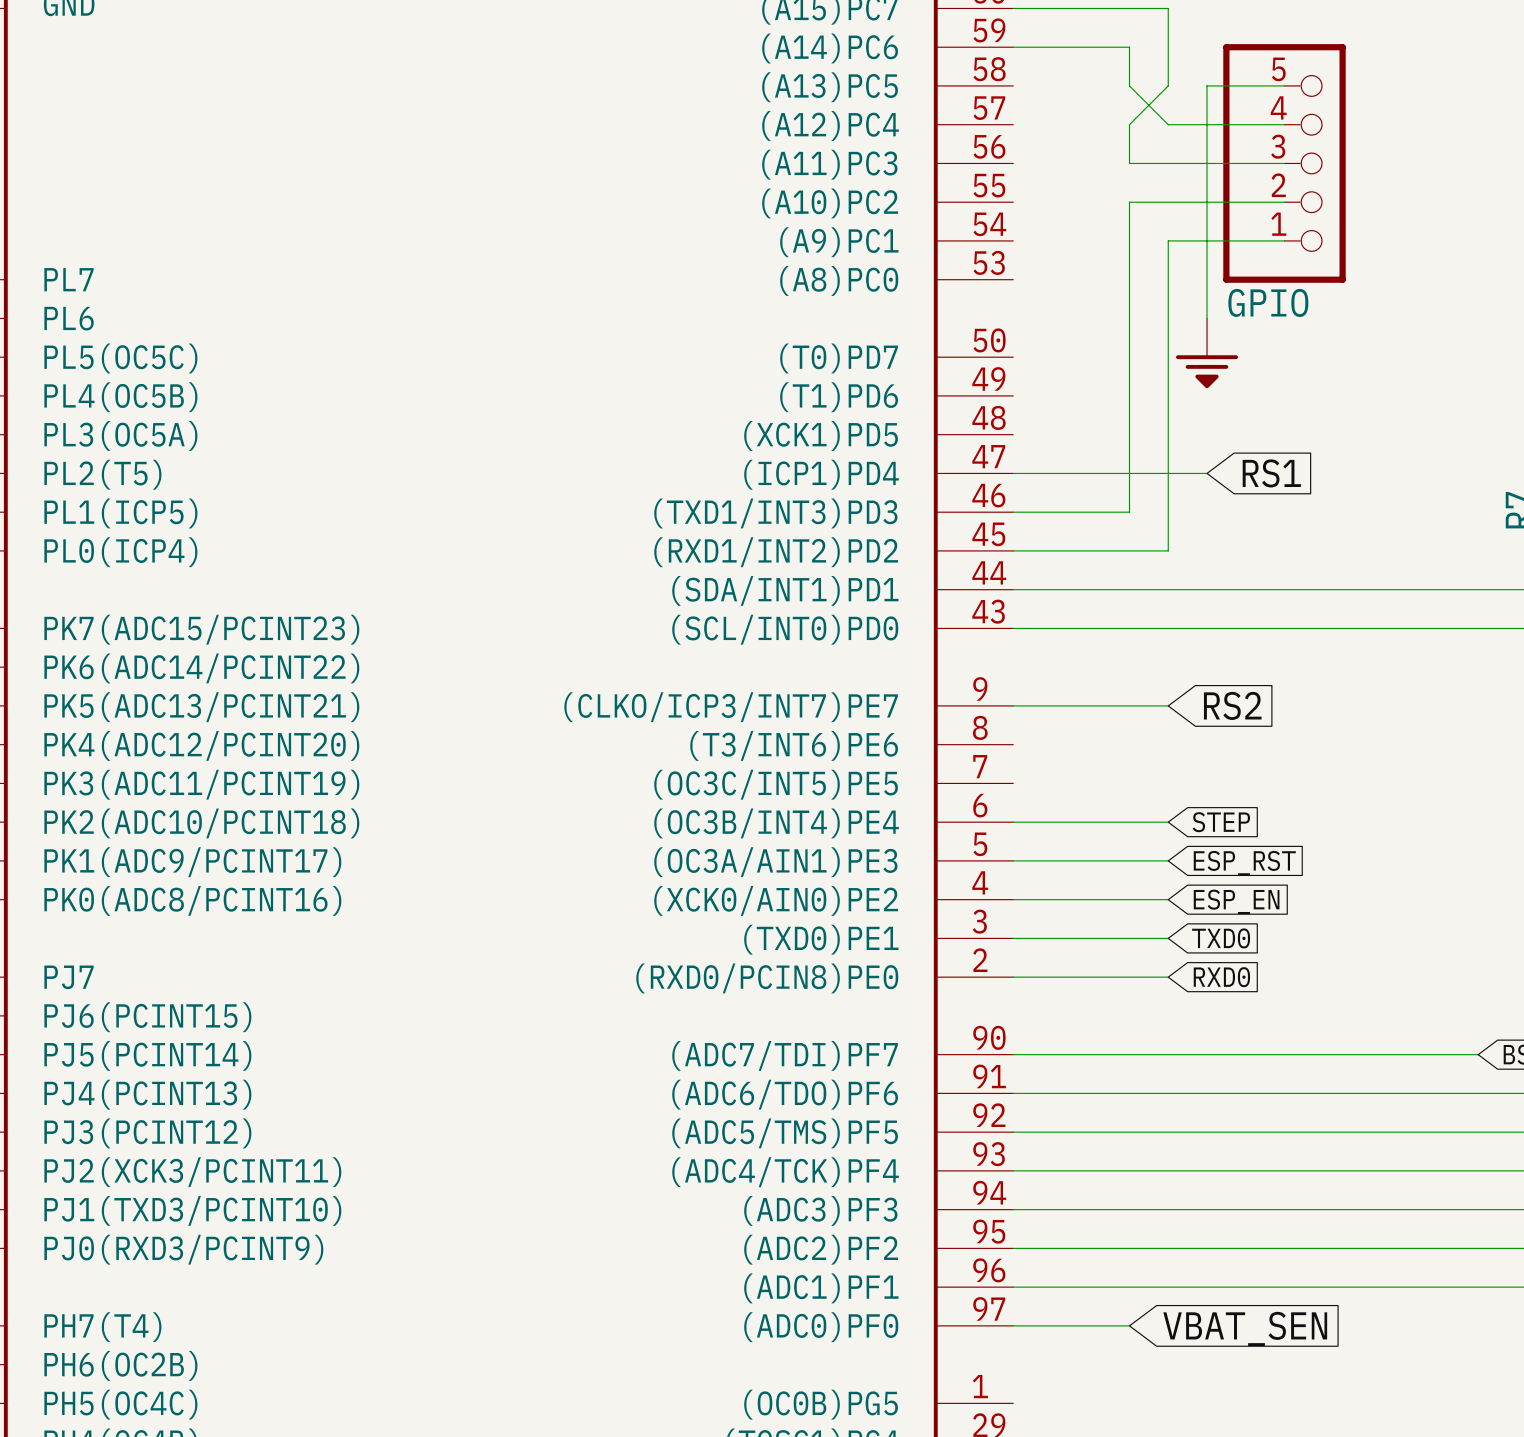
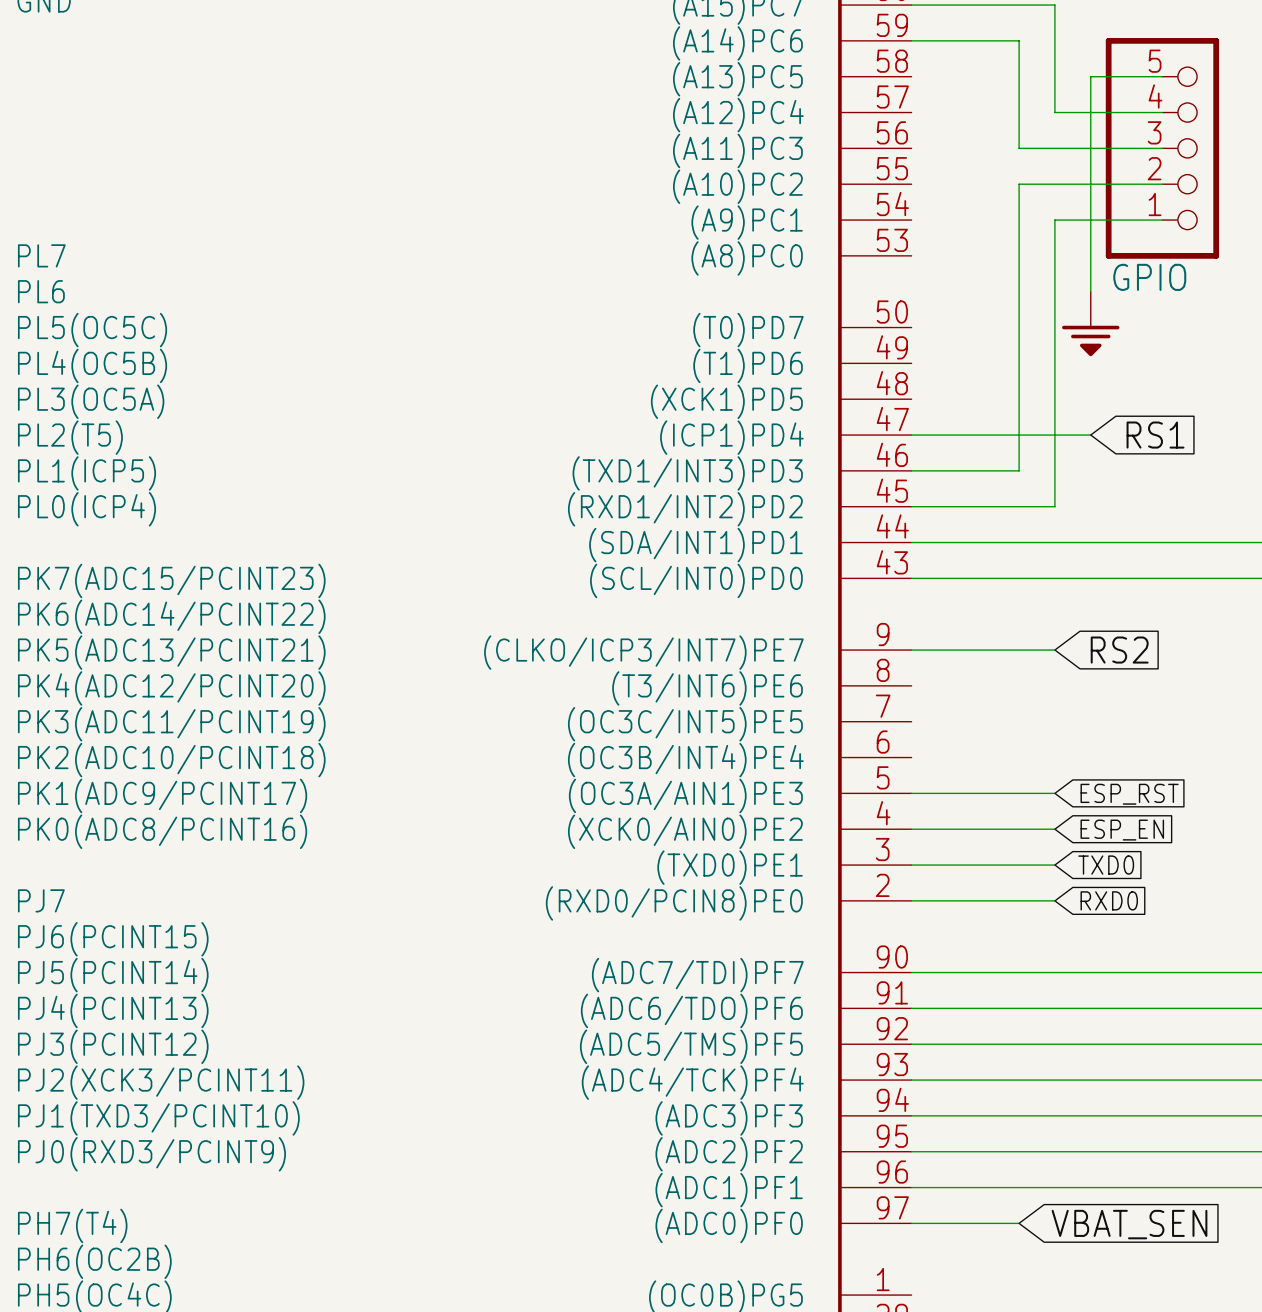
wire: (1129, 85) (1168, 124) -> (1019, 76) (1019, 112)
wire: (1168, 85) (1129, 124) -> (1054, 76) (1054, 112)
wire: (1013, 822) (1168, 822) -> none
global label: STEP (1221, 822) -> none

